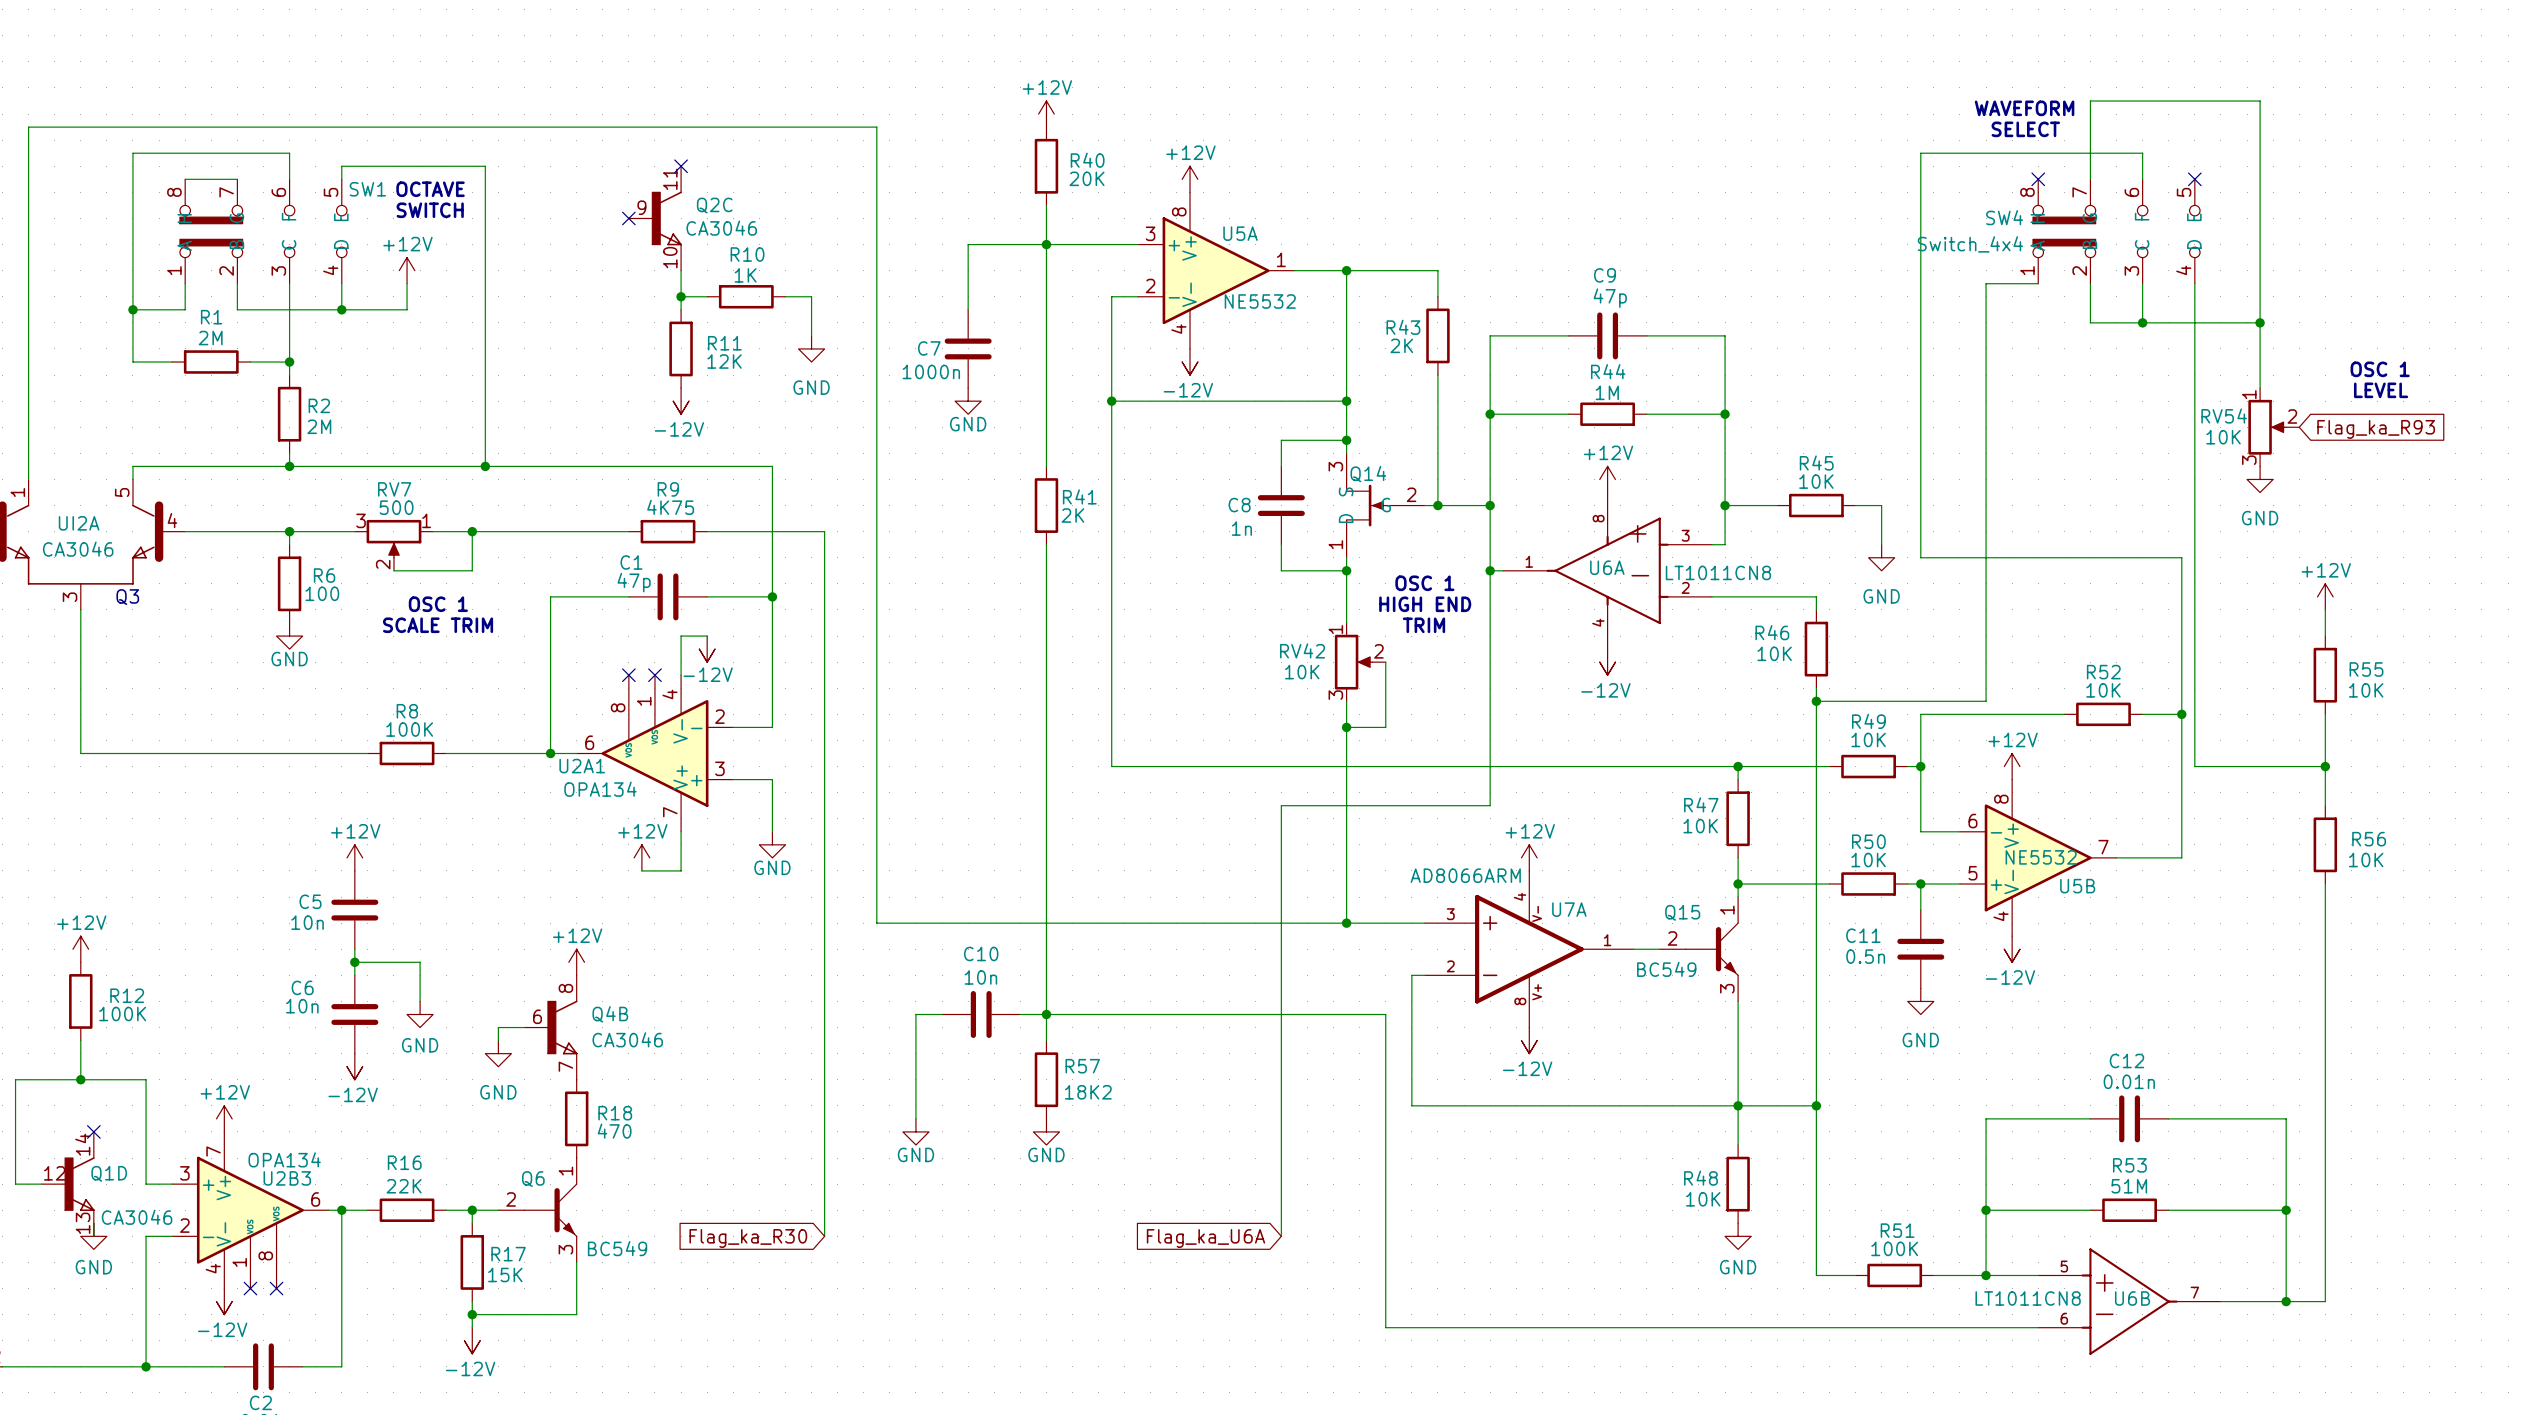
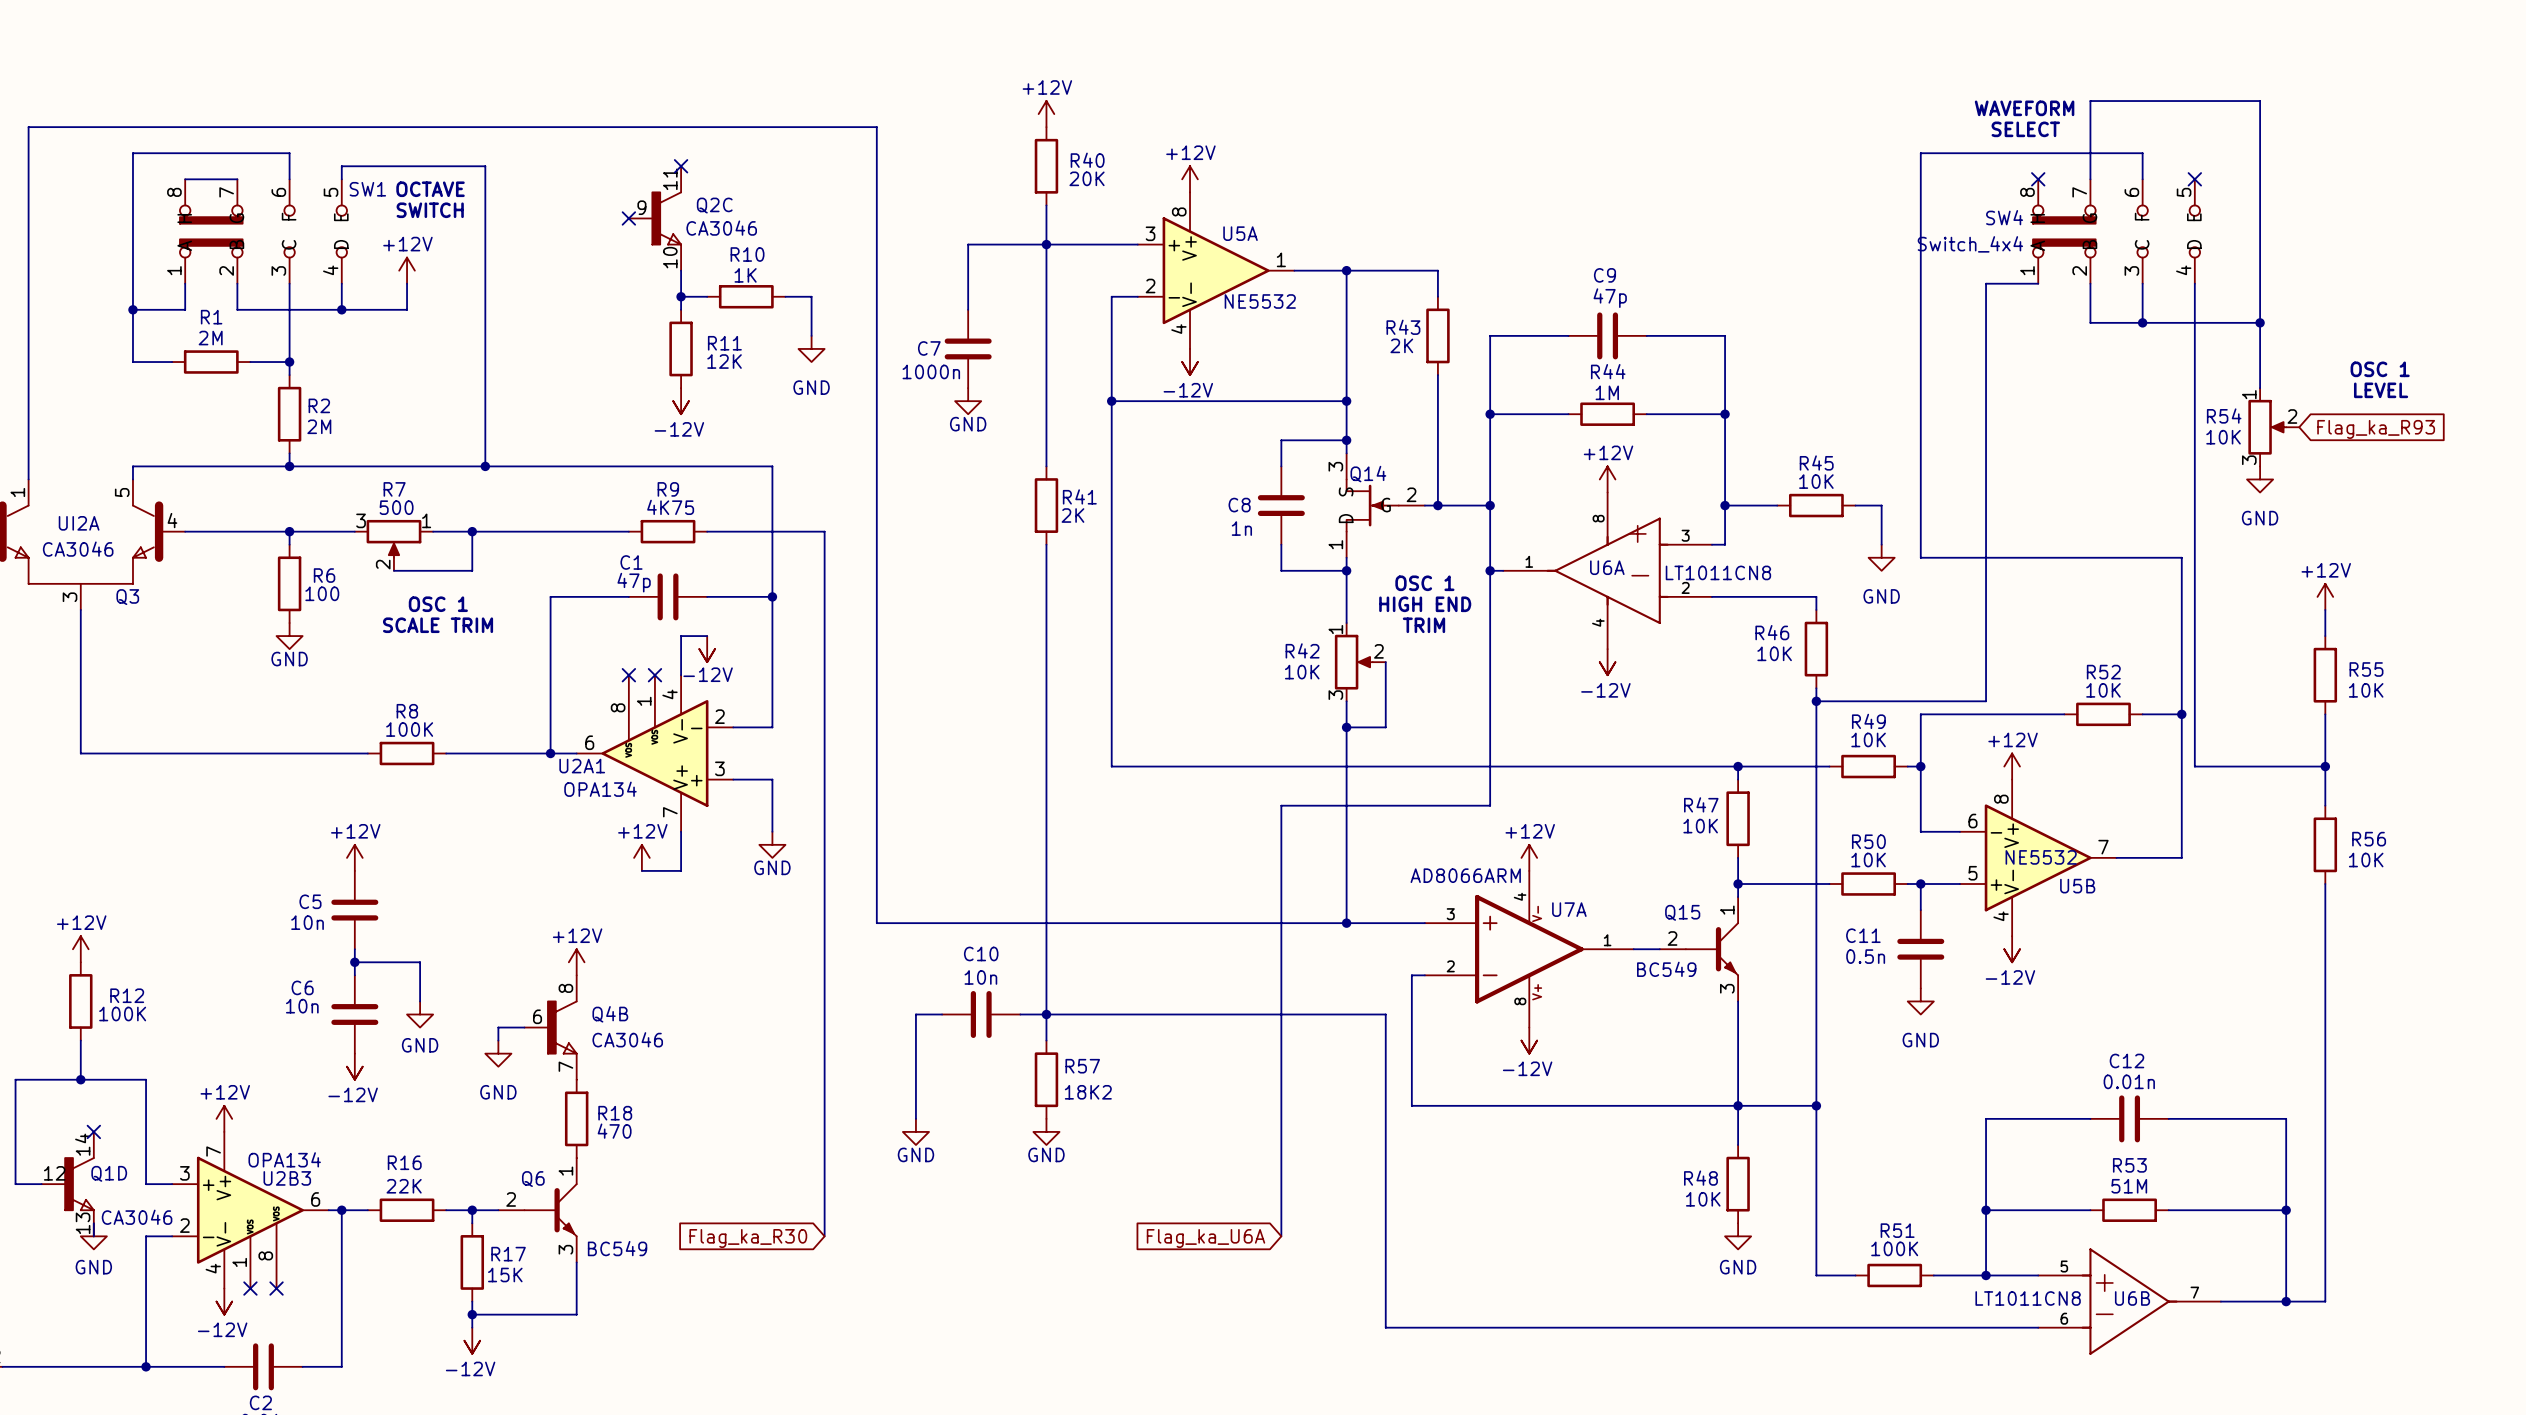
RV54 name: RV54 (2224, 416) -> R54 (2224, 416)
RV7 name: RV7 (394, 489) -> R7 (394, 489)
RV42 name: RV42 (1302, 650) -> R42 (1302, 650)

